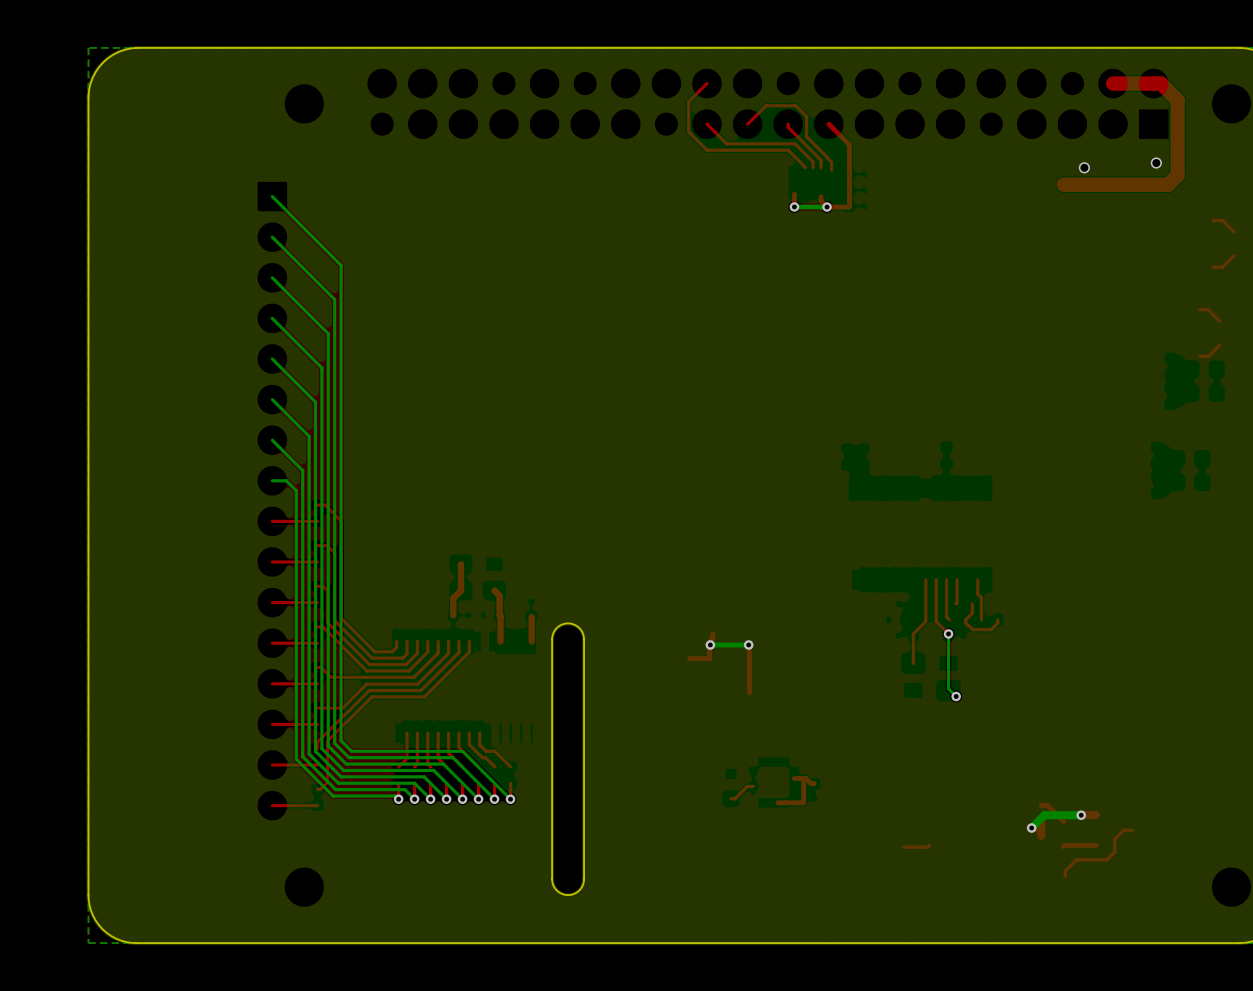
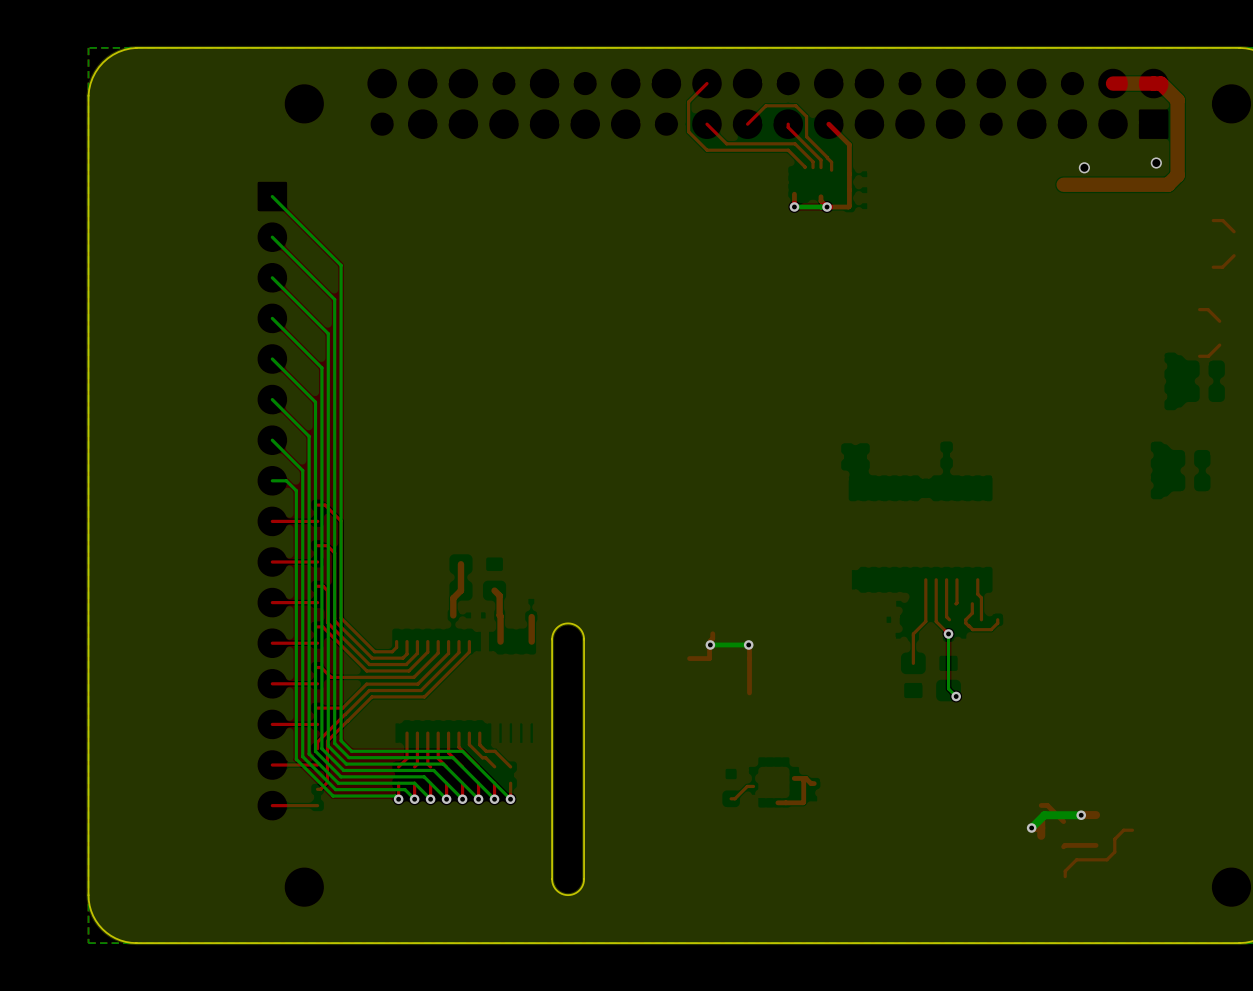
top track: (929, 845) (927, 847) (903, 847) -> none

